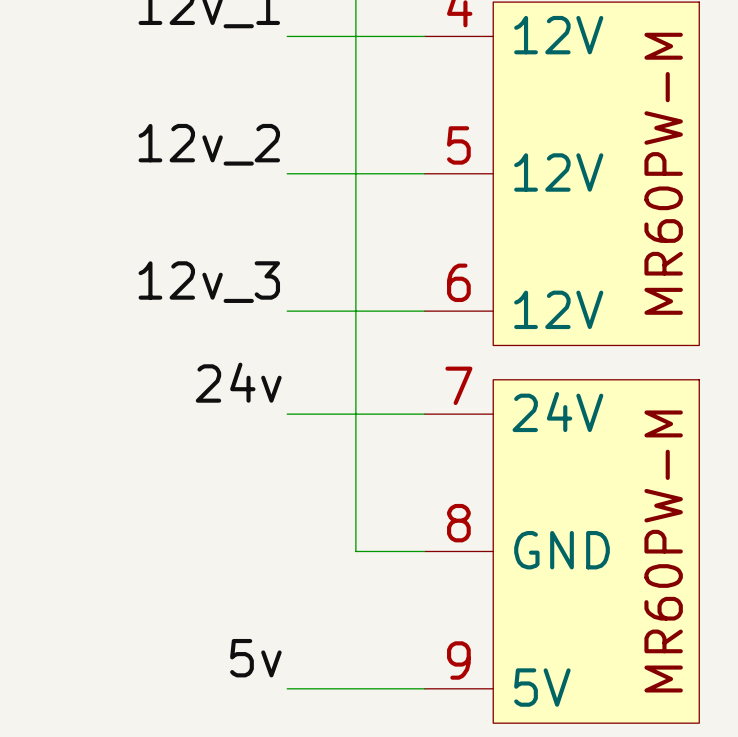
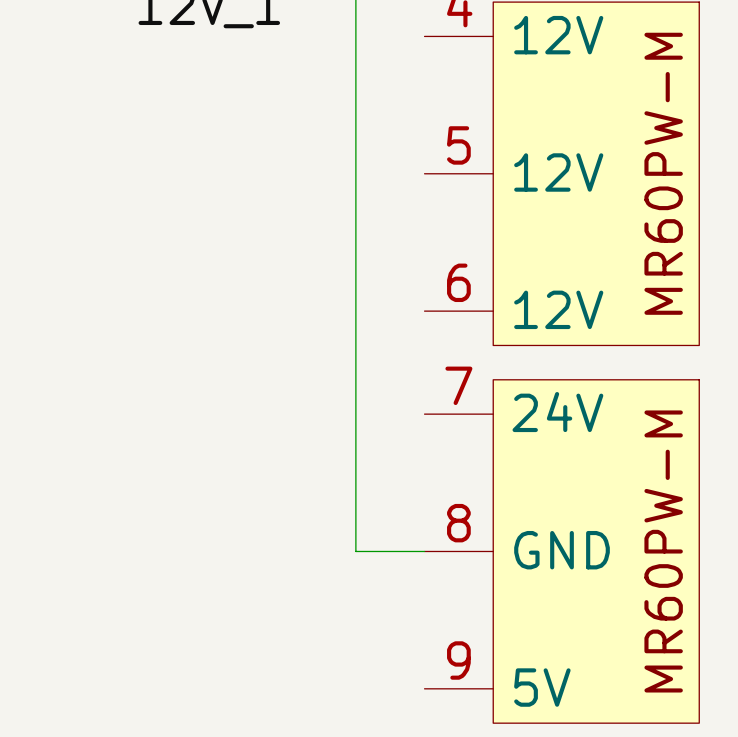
wire: (287, 36) (424, 36) -> none
label: 12v_2 (209, 144) -> none
wire: (287, 173) (424, 173) -> none
label: 12v_3 (209, 282) -> none
wire: (287, 311) (424, 311) -> none
label: 24v (238, 382) -> none
wire: (287, 414) (424, 414) -> none
label: 5v (255, 658) -> none
wire: (287, 688) (424, 688) -> none

